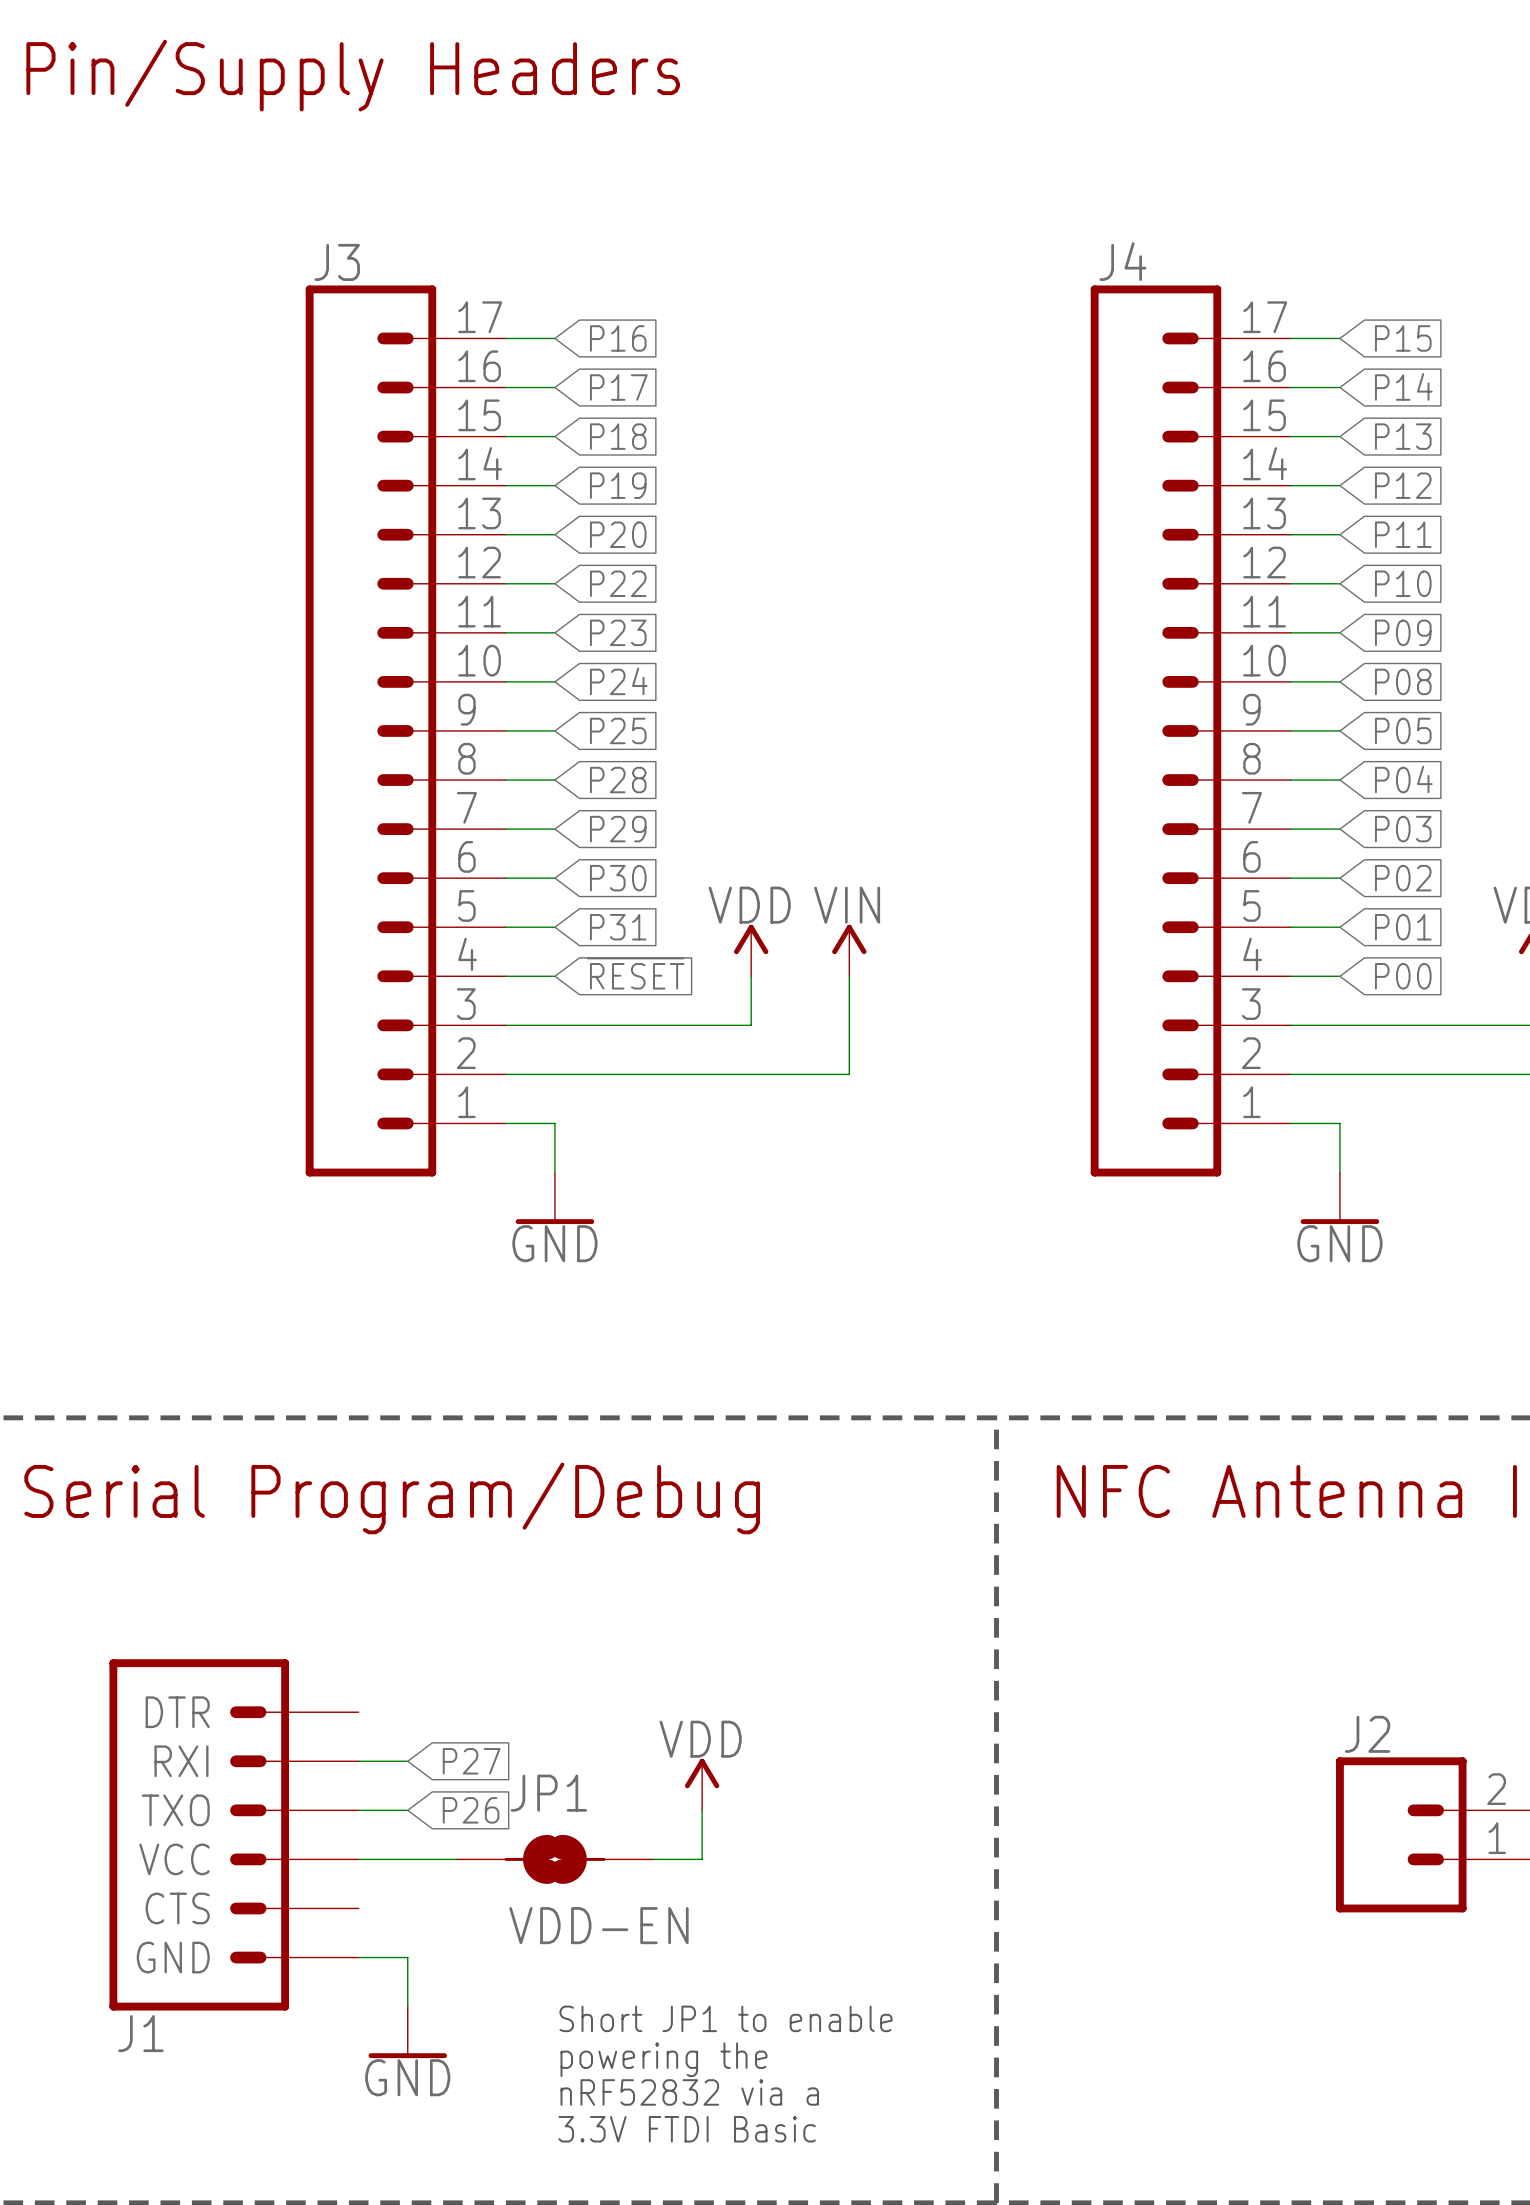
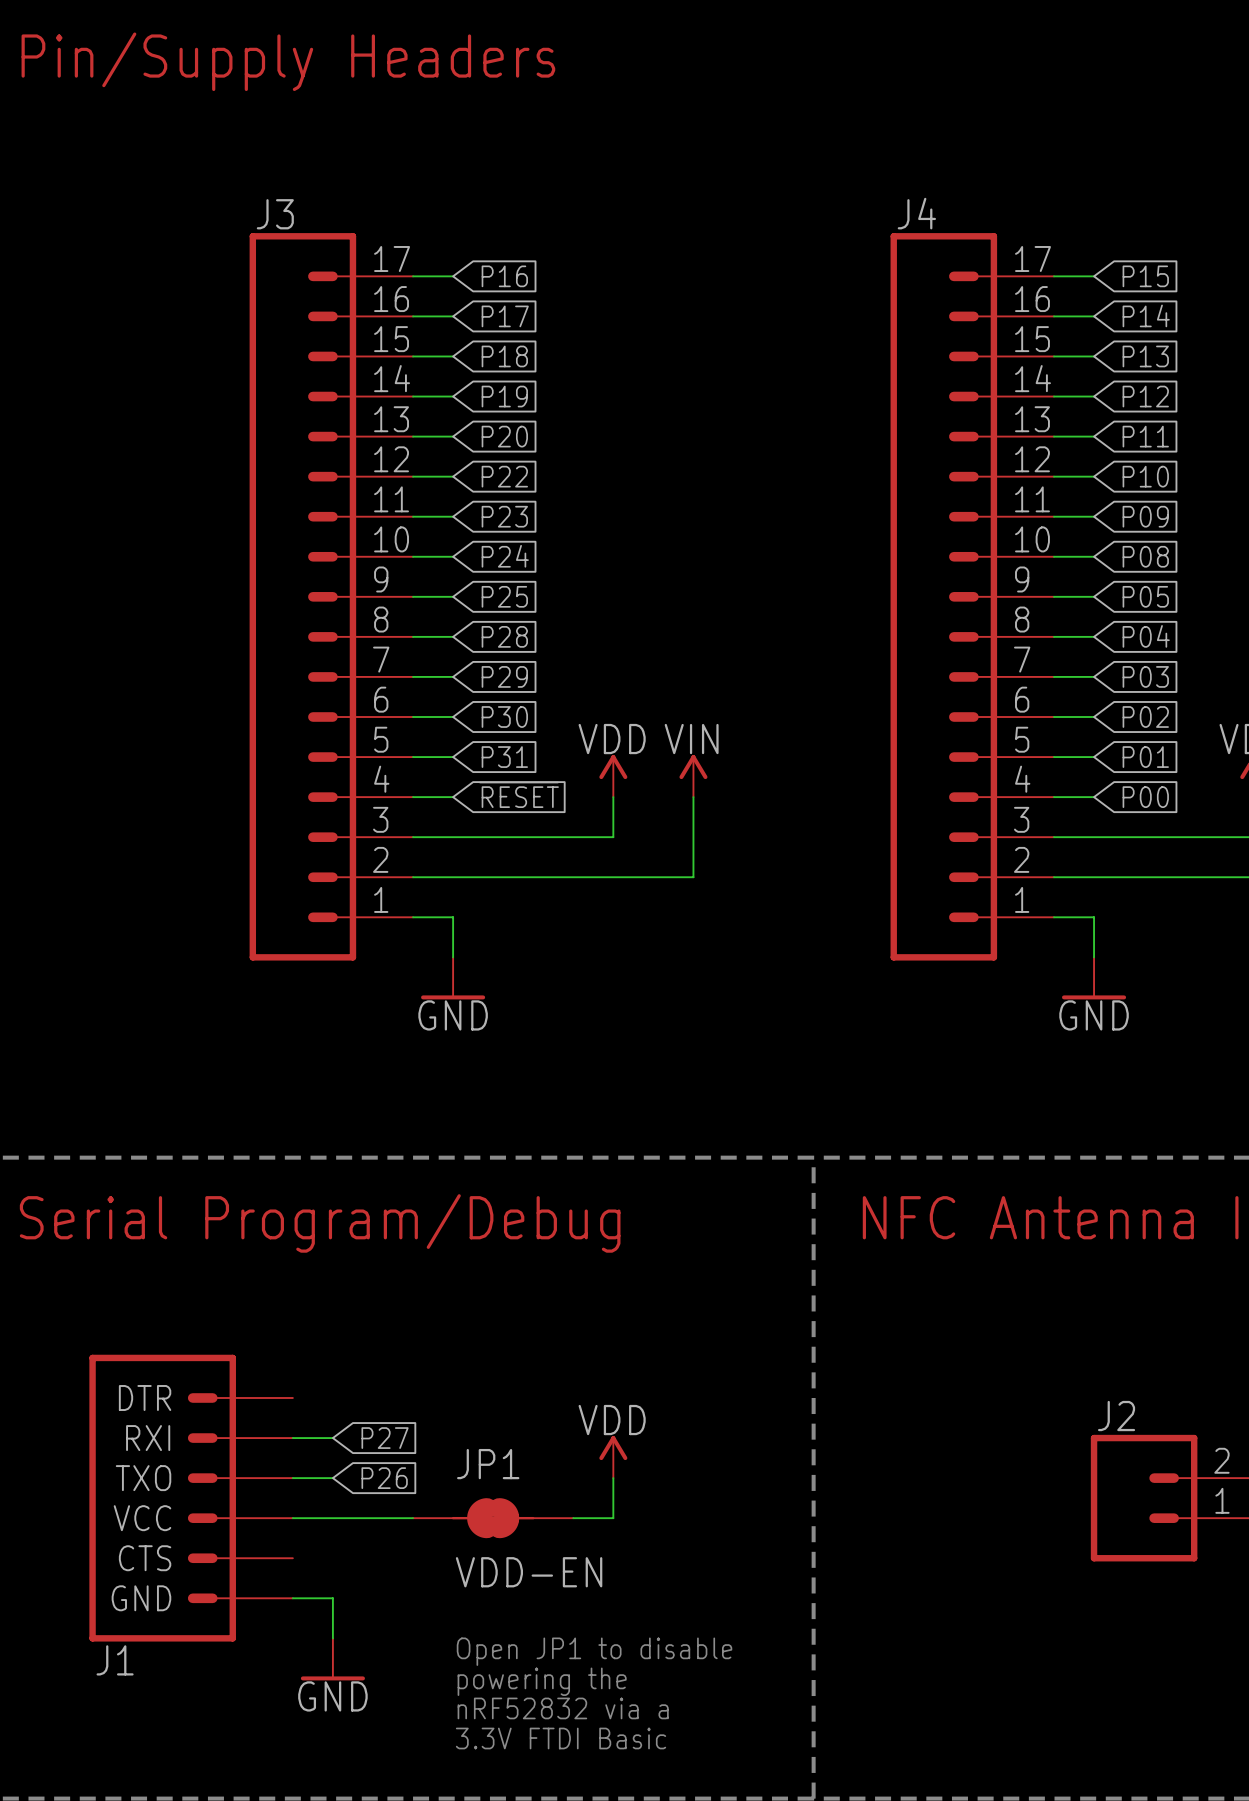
power symbol position: VDD (702, 1784) -> VDD (613, 1457)
wire: (702, 1810) (702, 1859) (653, 1859) -> (613, 1478) (613, 1518) (573, 1518)
JP1 symbol: [456, 1834, 654, 1884] -> [413, 1498, 574, 1539]
text: Short JP1 to enable (726, 2018) -> Open JP1 to disable (594, 1651)

